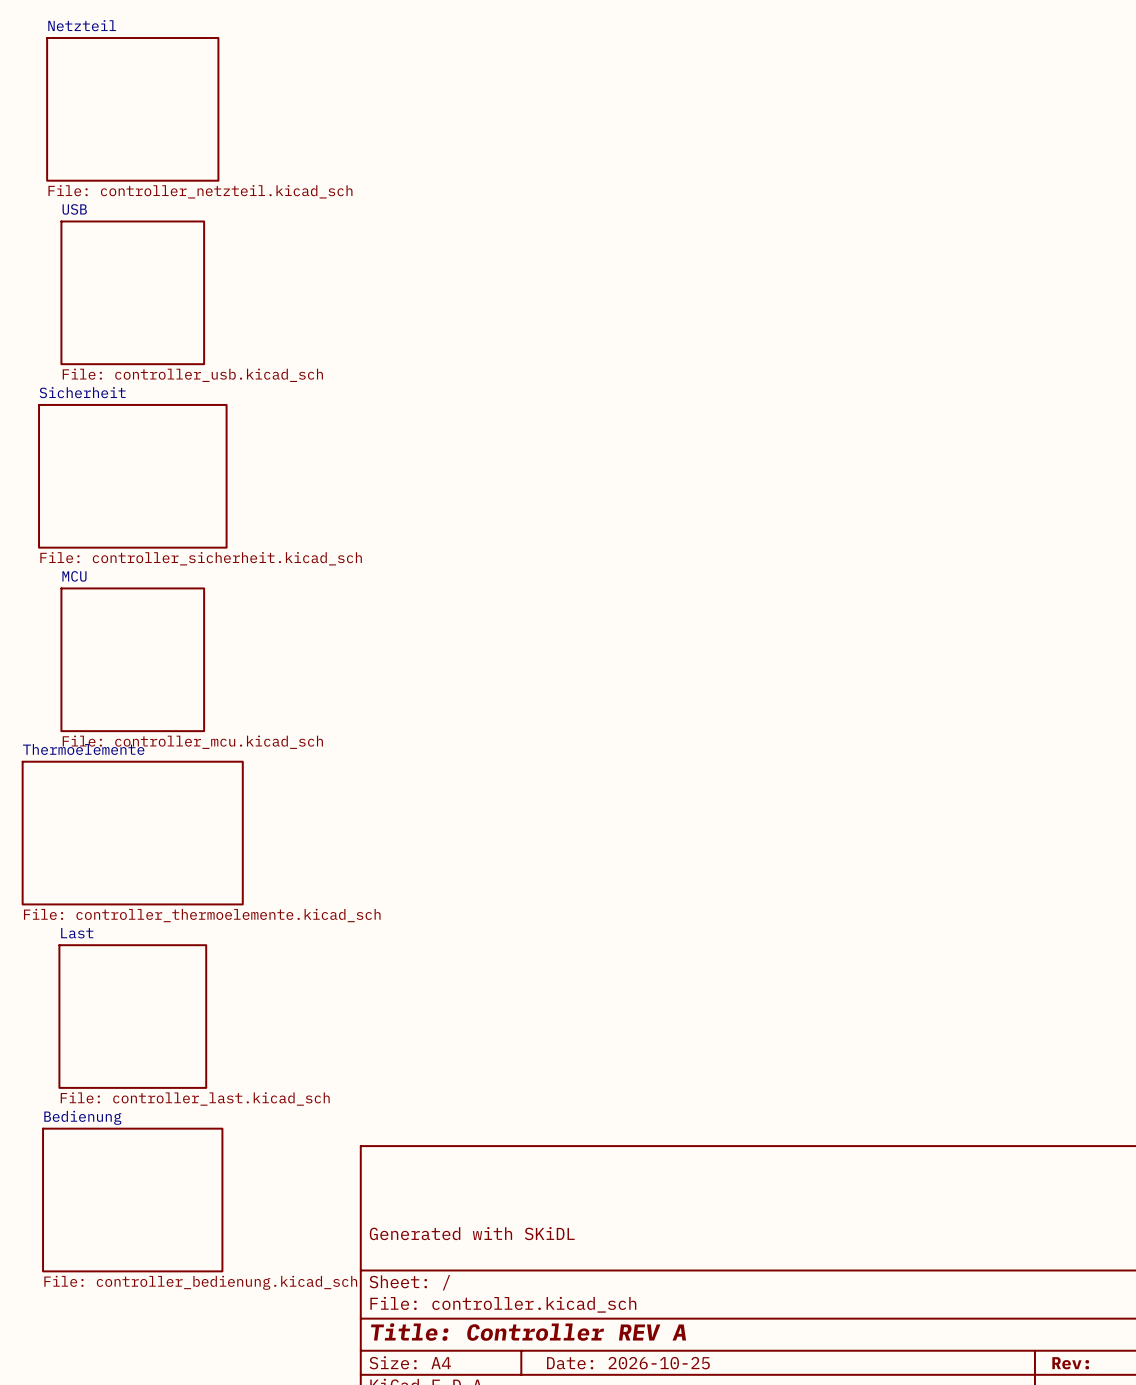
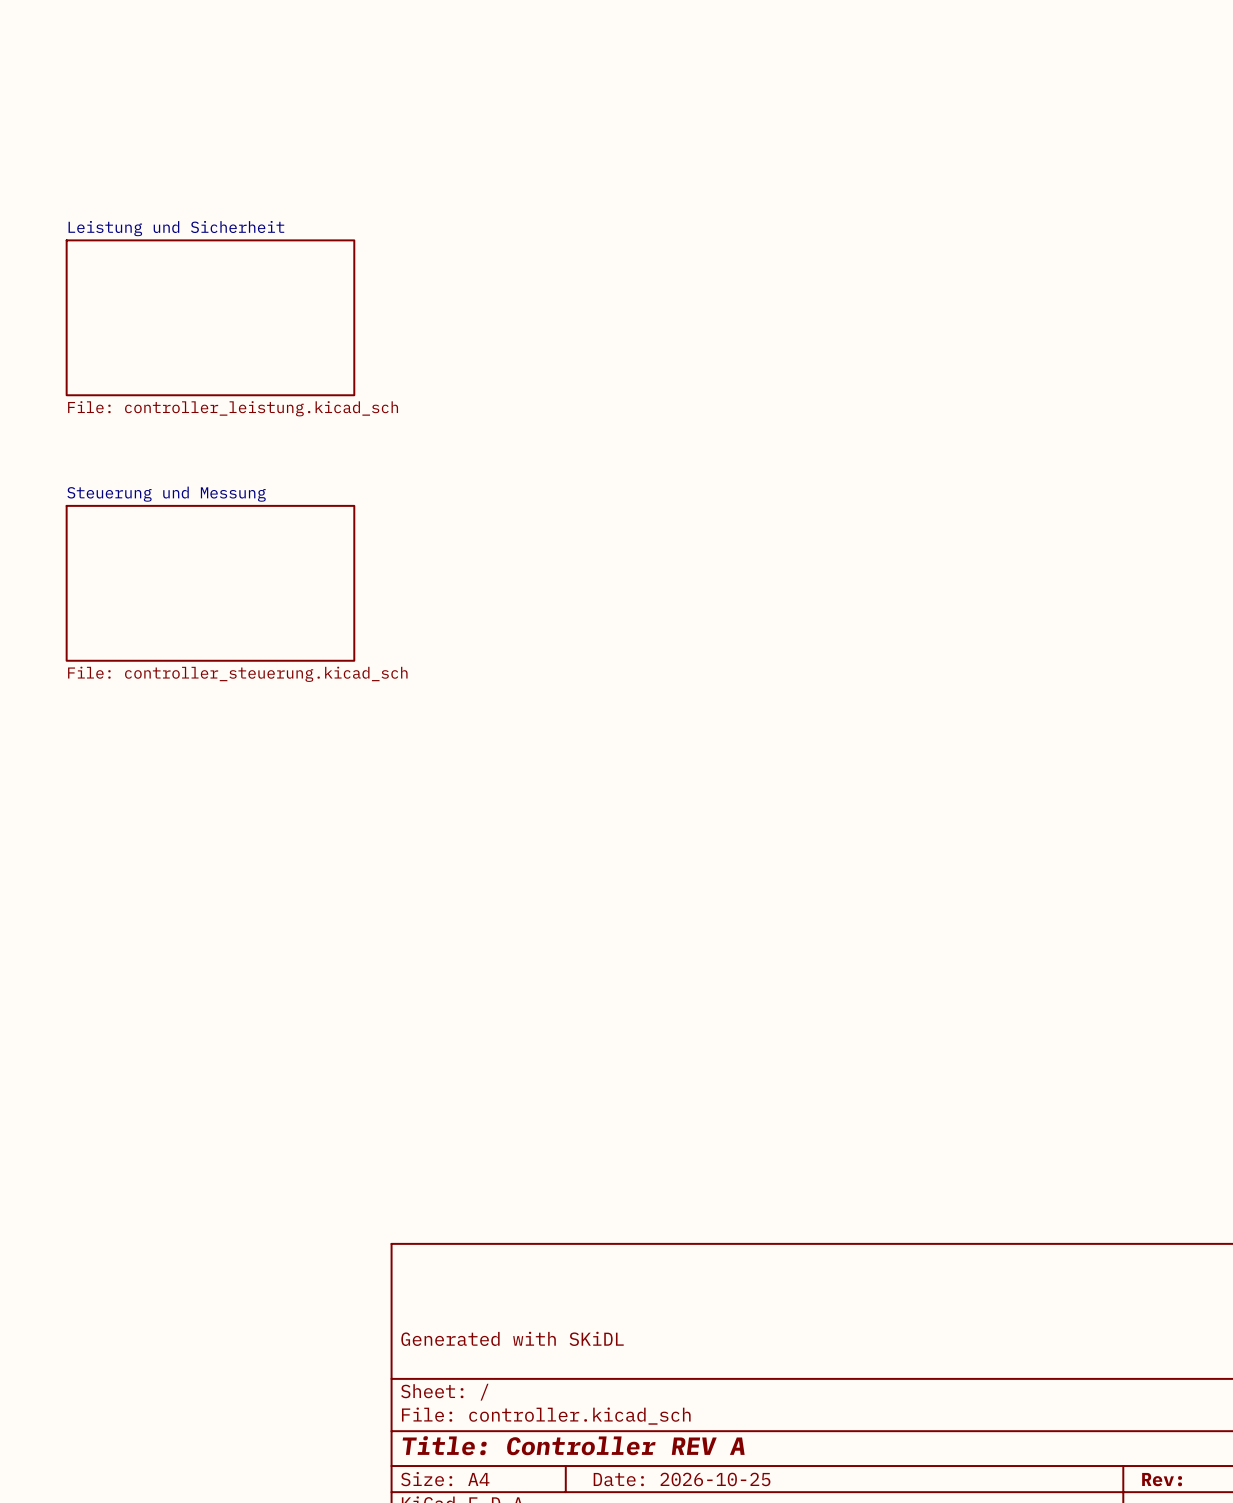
sheet Netzteil: File: controller_netzteil.kicad_sch (132, 109) -> none
sheet USB: File: controller_usb.kicad_sch (132, 292) -> none
sheet Leistung und Sicherheit: none -> File: controller_leistung.kicad_sch (210, 317)
sheet Sicherheit: File: controller_sicherheit.kicad_sch (132, 476) -> none
sheet Steuerung und Messung: none -> File: controller_steuerung.kicad_sch (210, 583)
sheet MCU: File: controller_mcu.kicad_sch (132, 659) -> none
sheet Thermoelemente: File: controller_thermoelemente.kicad_sch (132, 833) -> none
sheet Last: File: controller_last.kicad_sch (132, 1016) -> none
sheet Bedienung: File: controller_bedienung.kicad_sch (132, 1200) -> none

